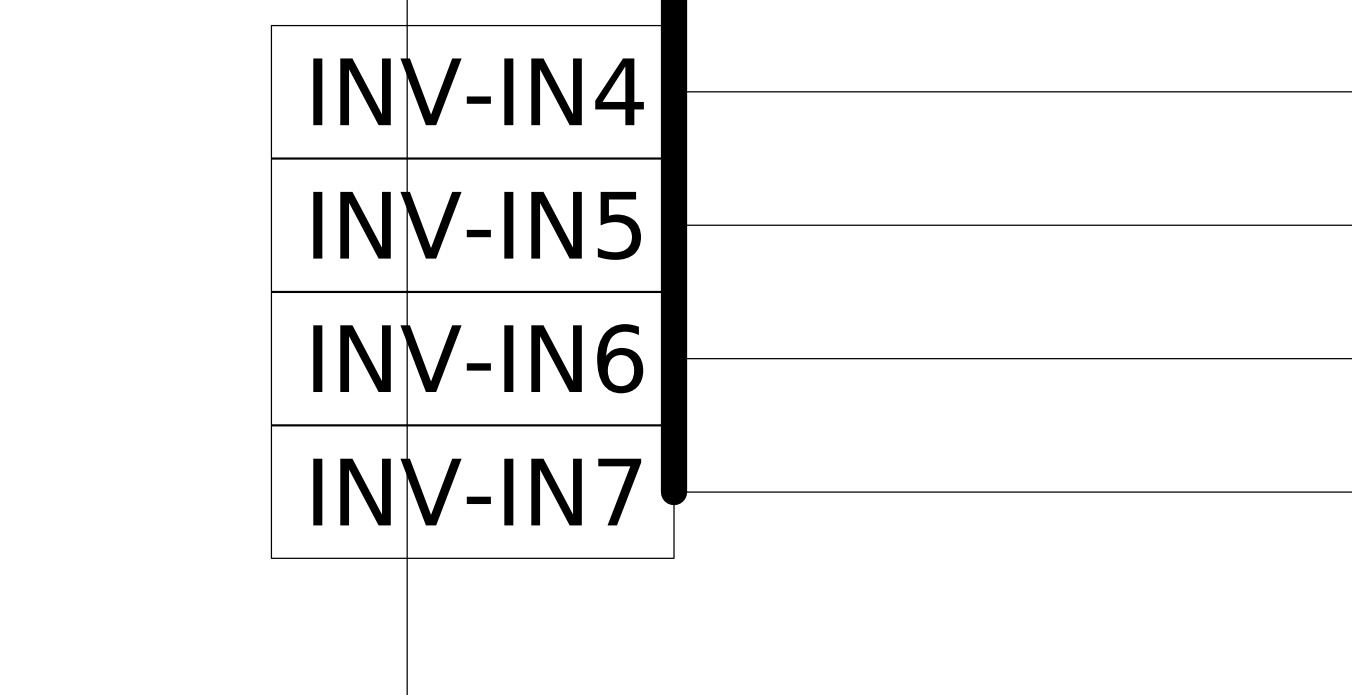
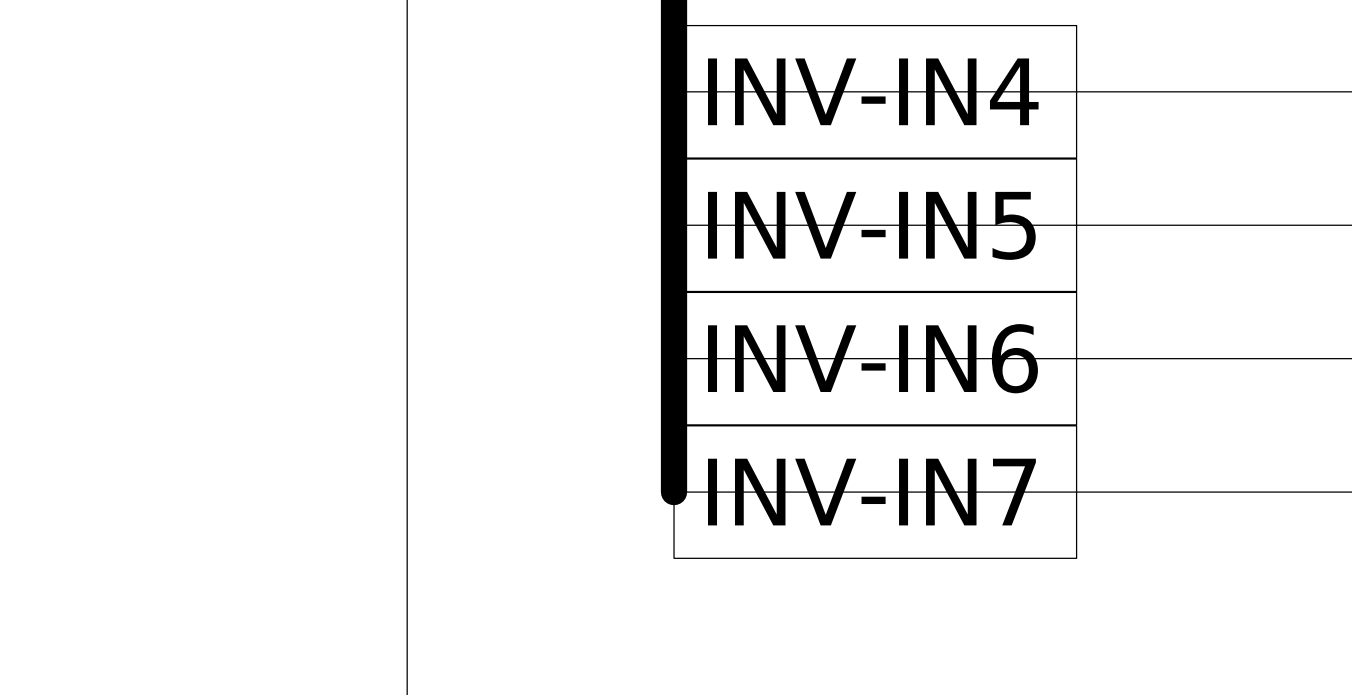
global label rotation: 0° (478, 91) -> 180° (873, 91)
global label rotation: 0° (477, 225) -> 180° (871, 225)
global label rotation: 0° (478, 358) -> 180° (872, 358)
global label rotation: 0° (477, 492) -> 180° (871, 492)

